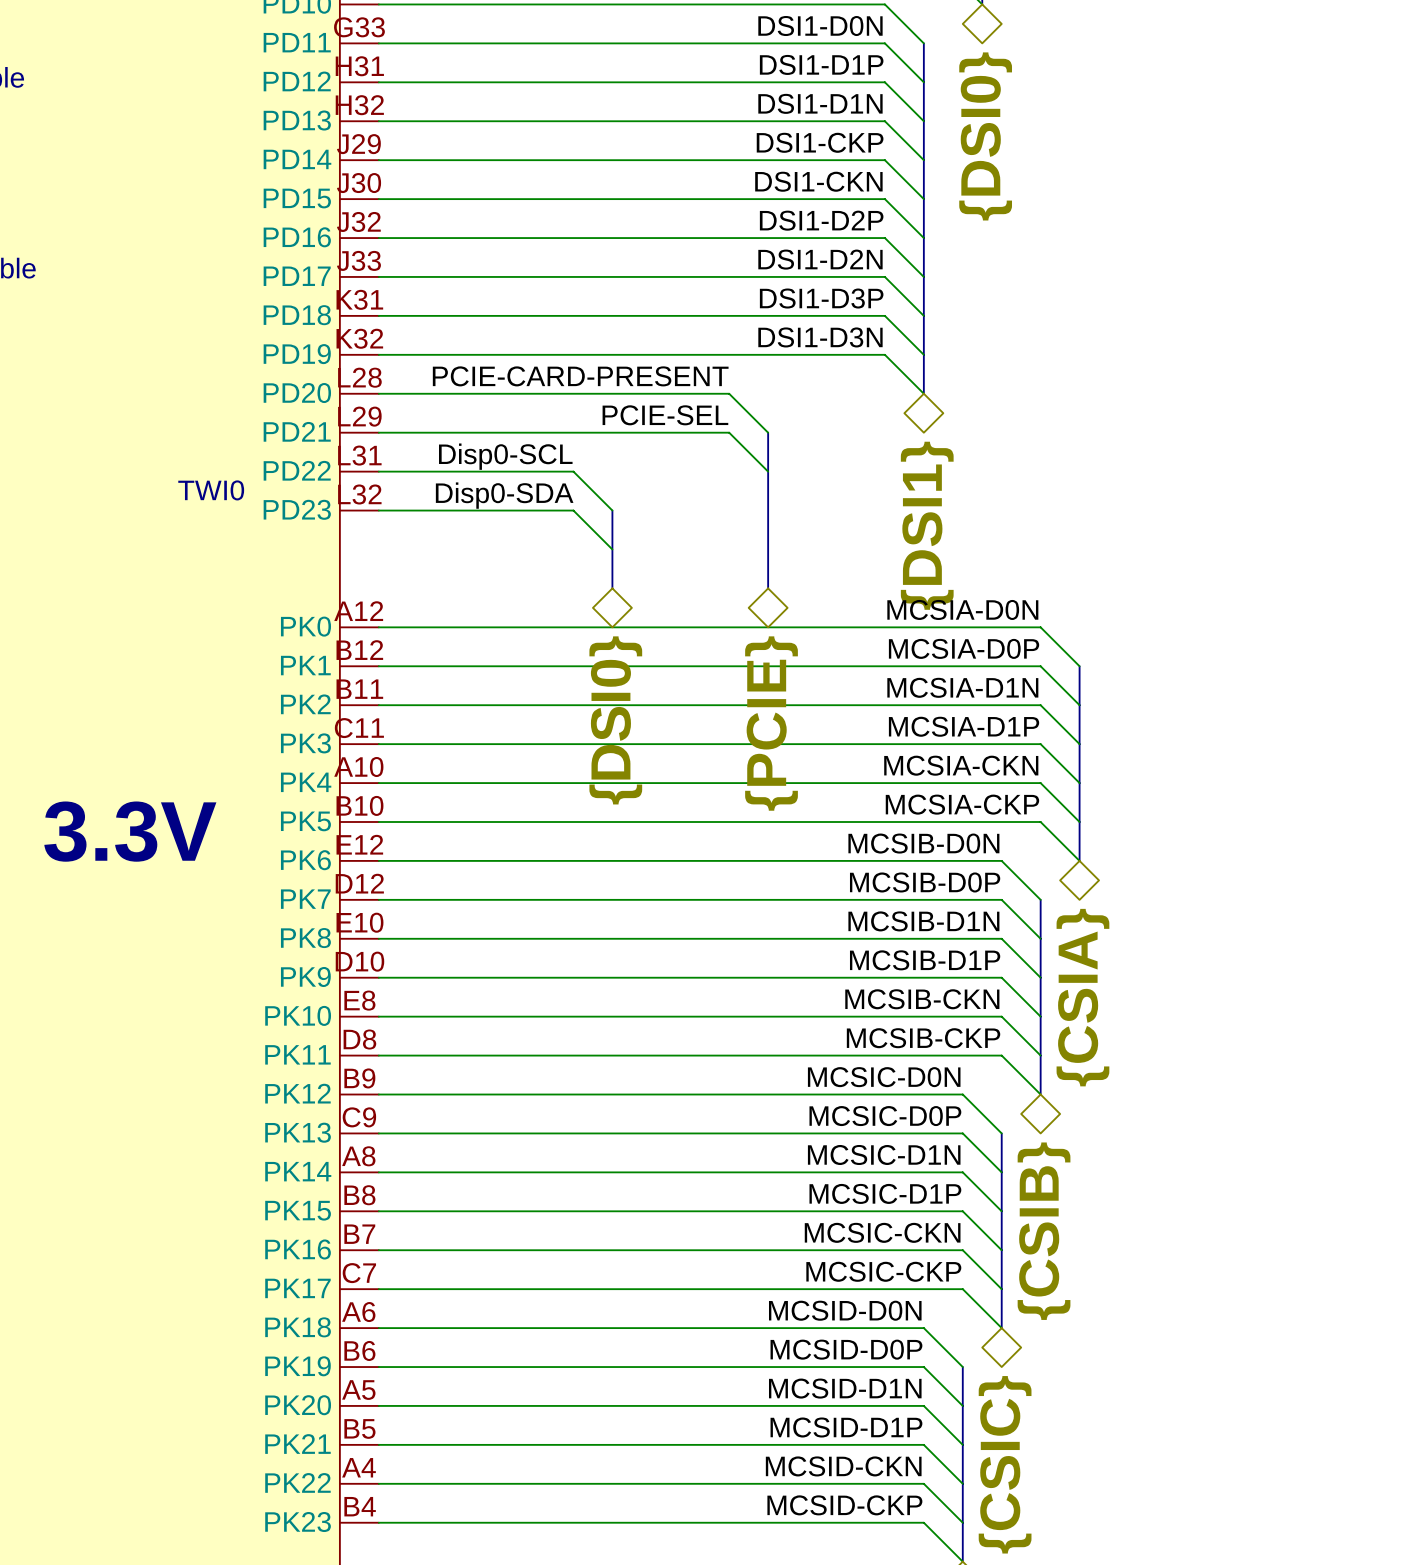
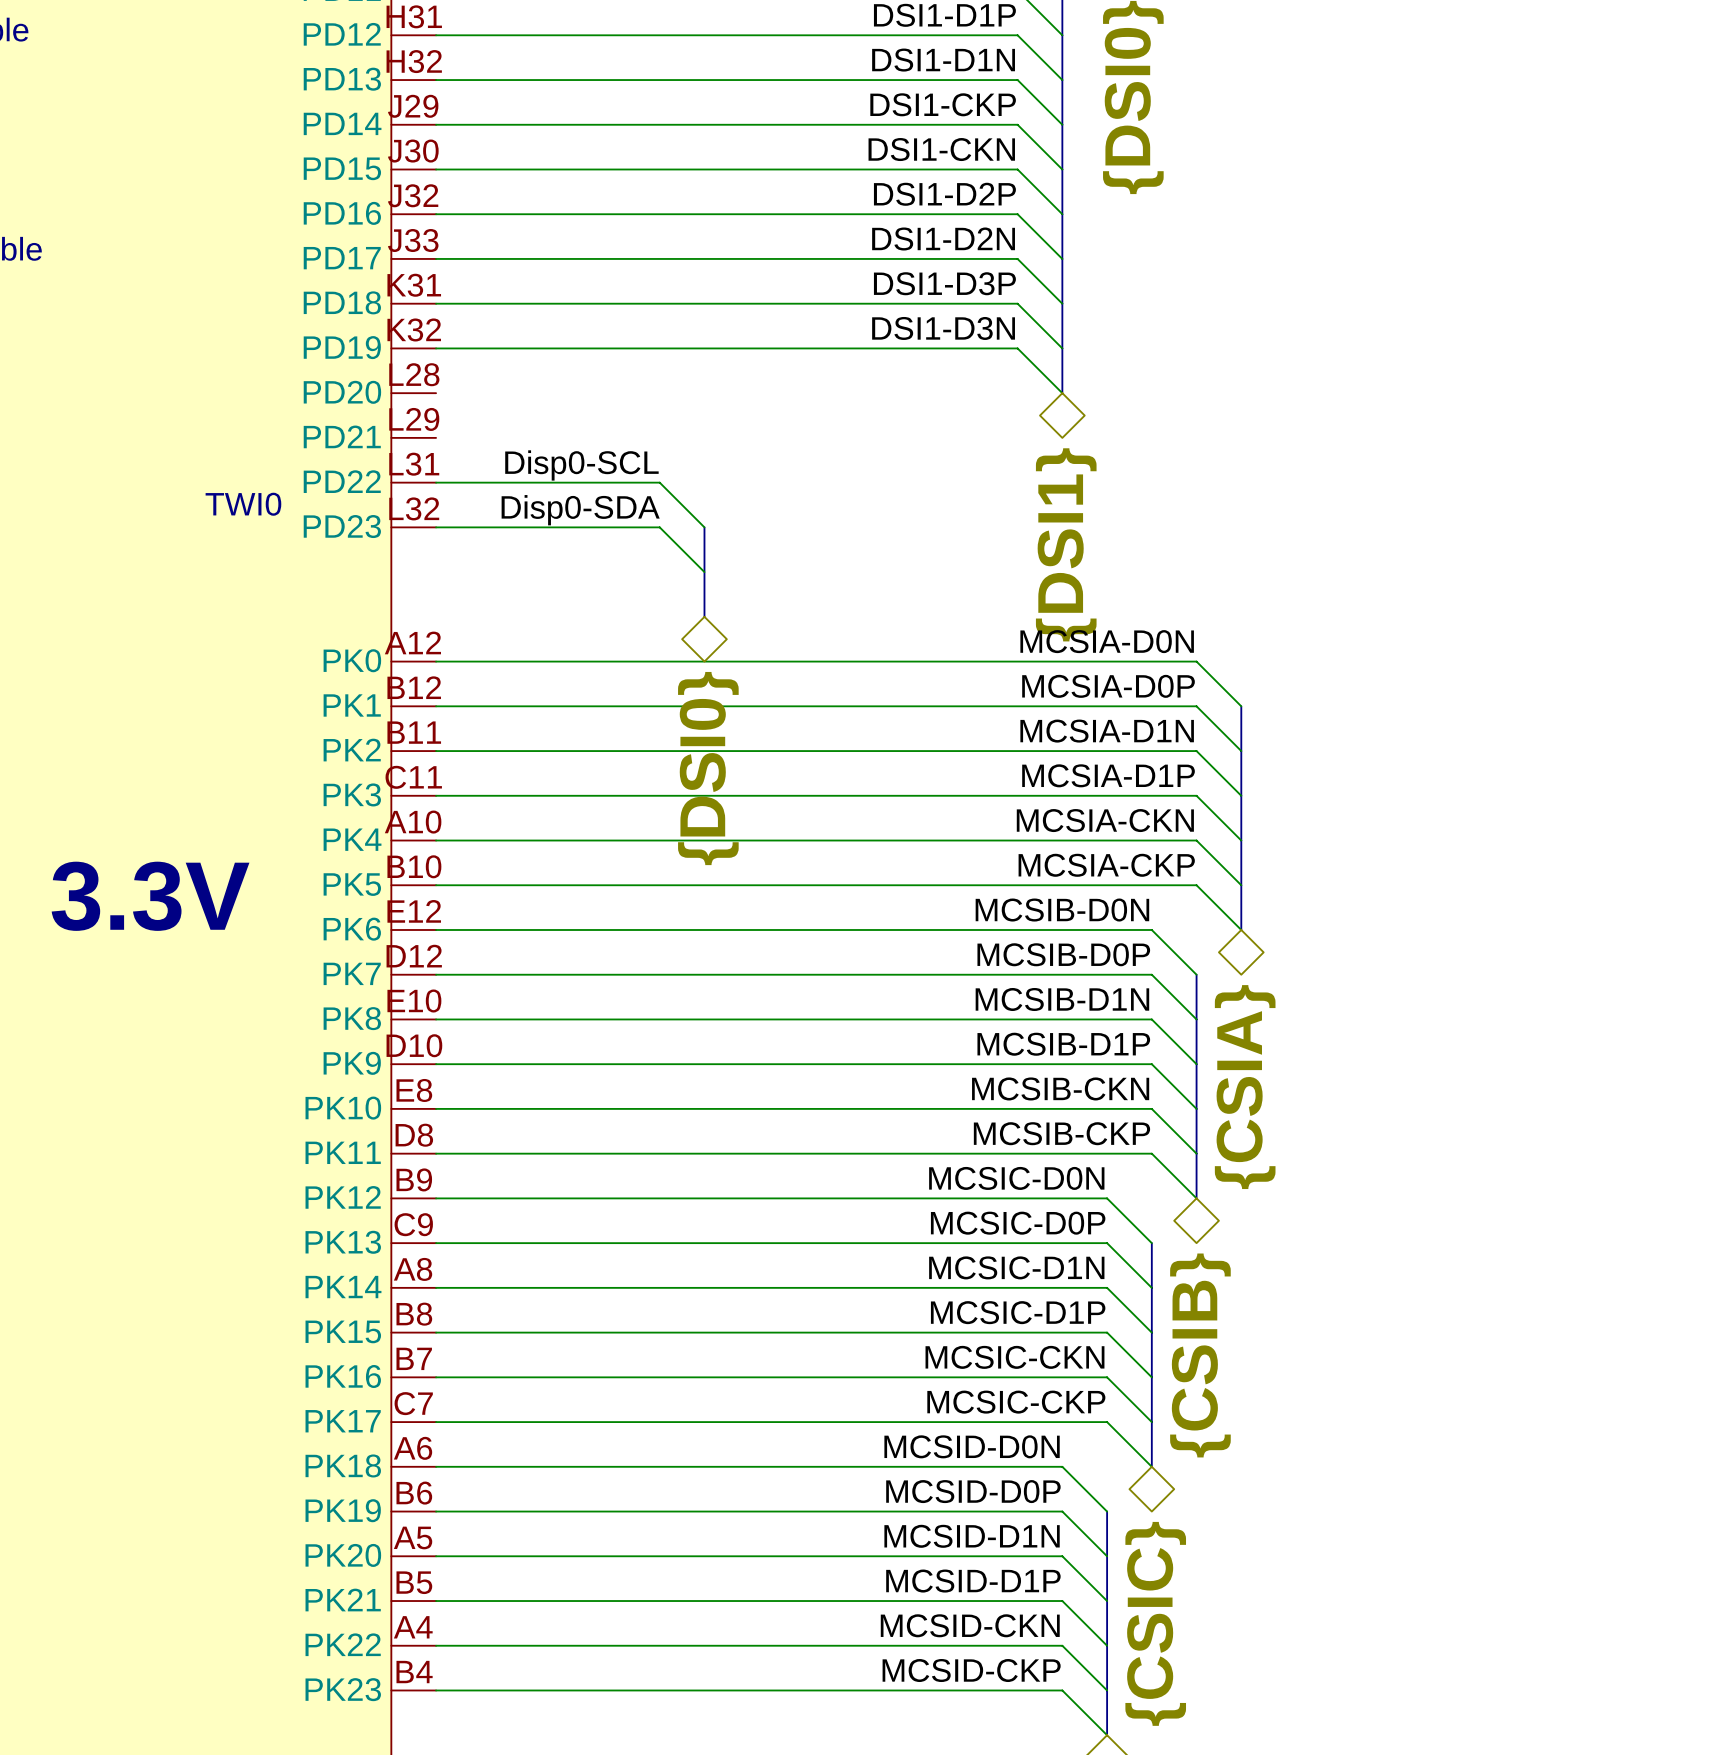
label: PCIE-CARD-PRESENT (580, 376) -> none
wire: (378, 393) (729, 393) (768, 432) -> none
label: PCIE-SEL (665, 415) -> none
wire: (378, 432) (729, 432) (768, 471) -> none
bus: (768, 432) (768, 588) -> none
hierarchical label: {PCIE} (771, 723) -> none

